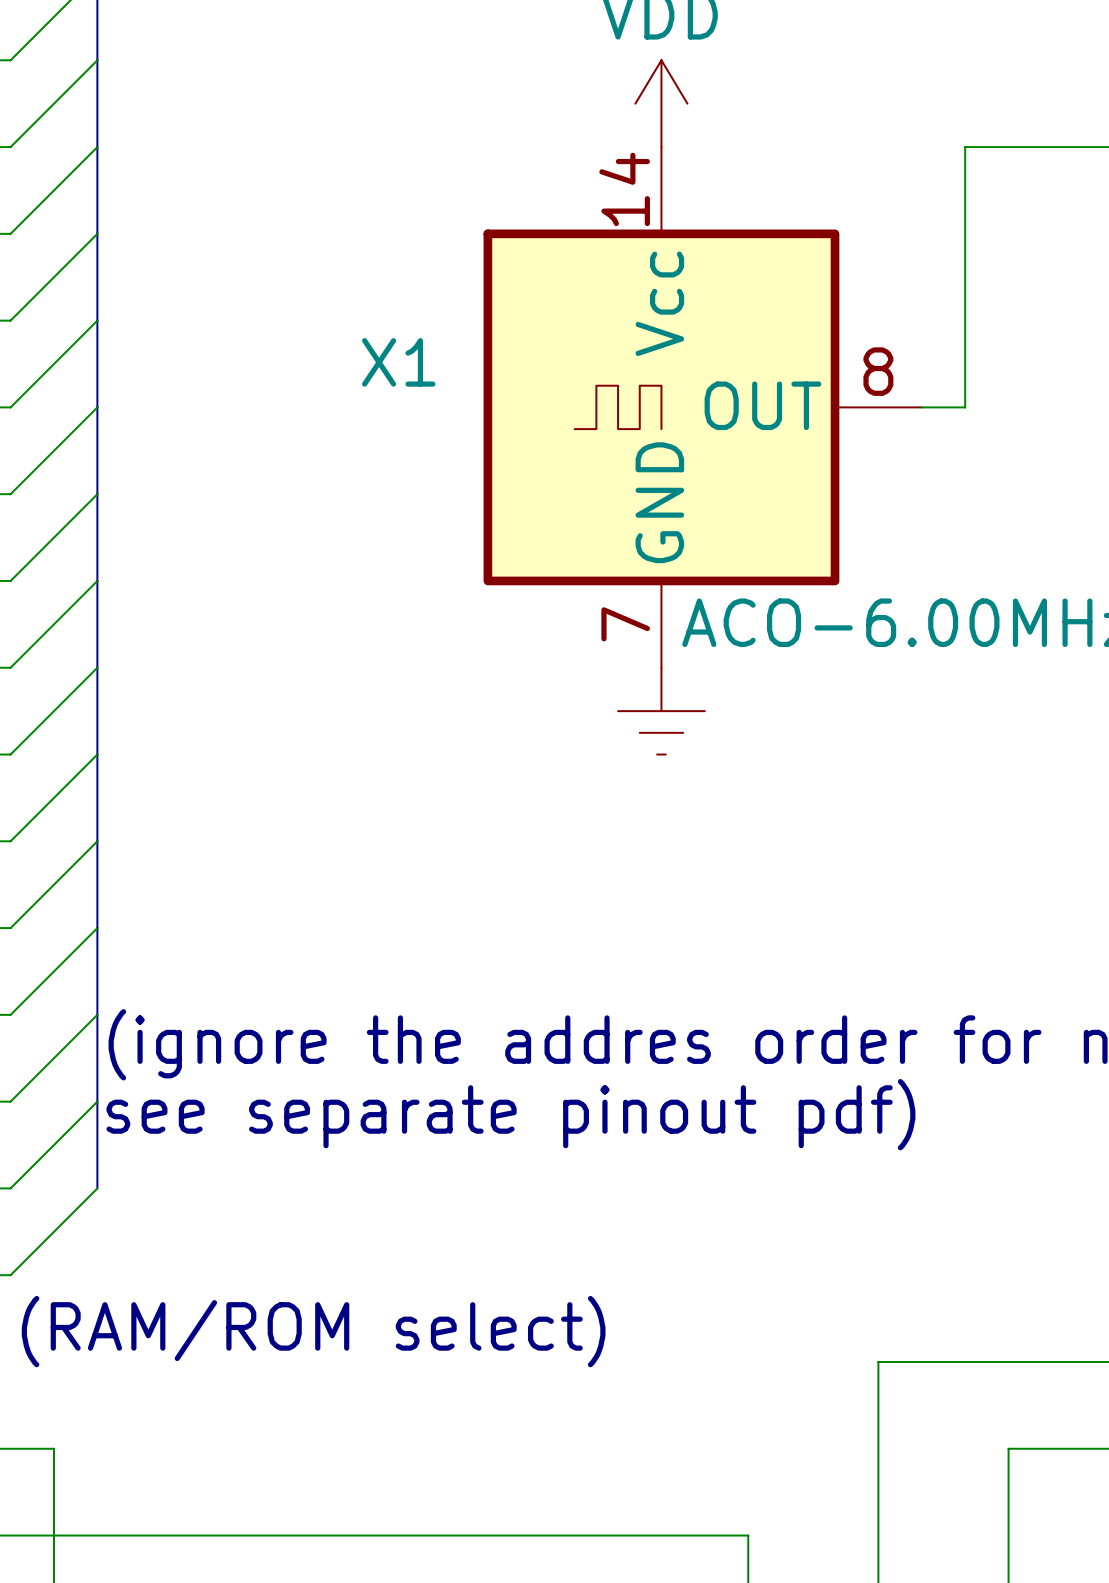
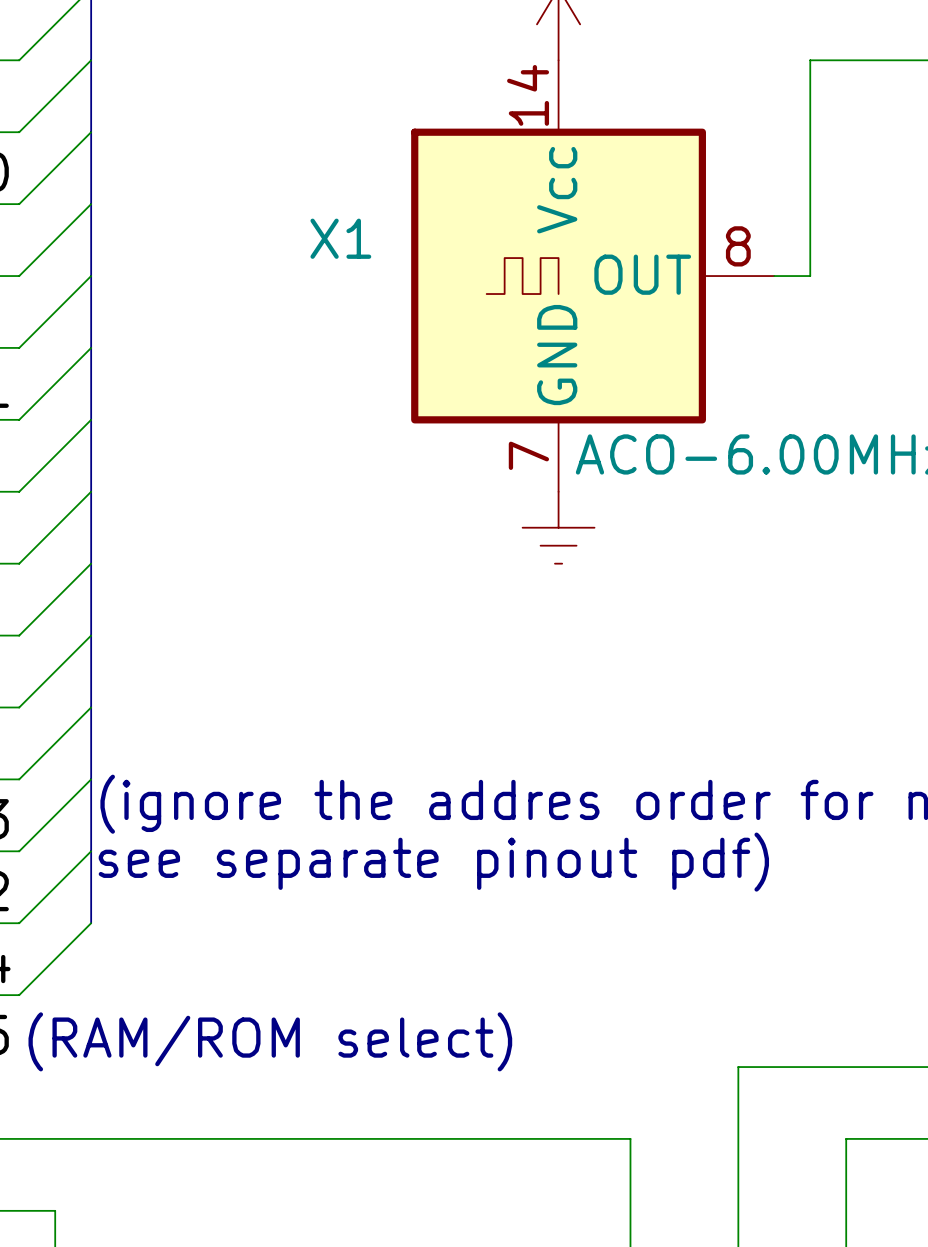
wire: (54, 1448) (54, 1535) (748, 1535) -> (55, 1138) (630, 1138) (630, 1210)

